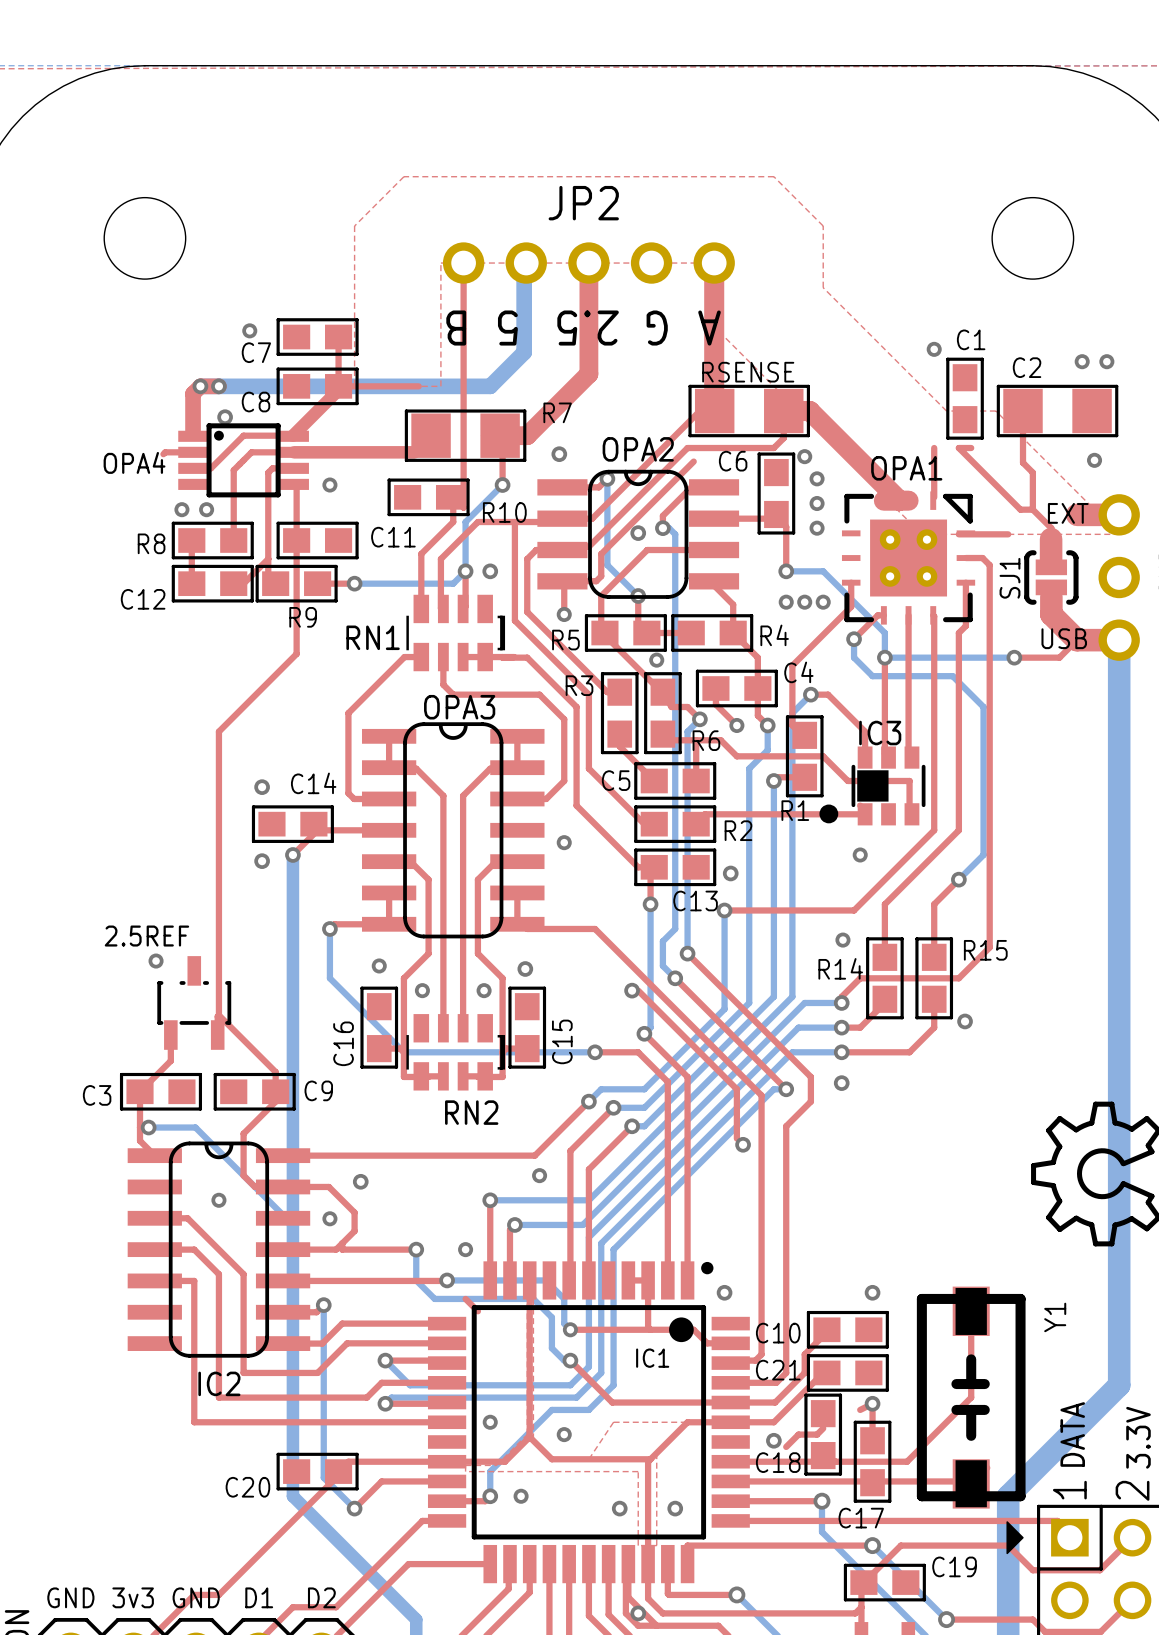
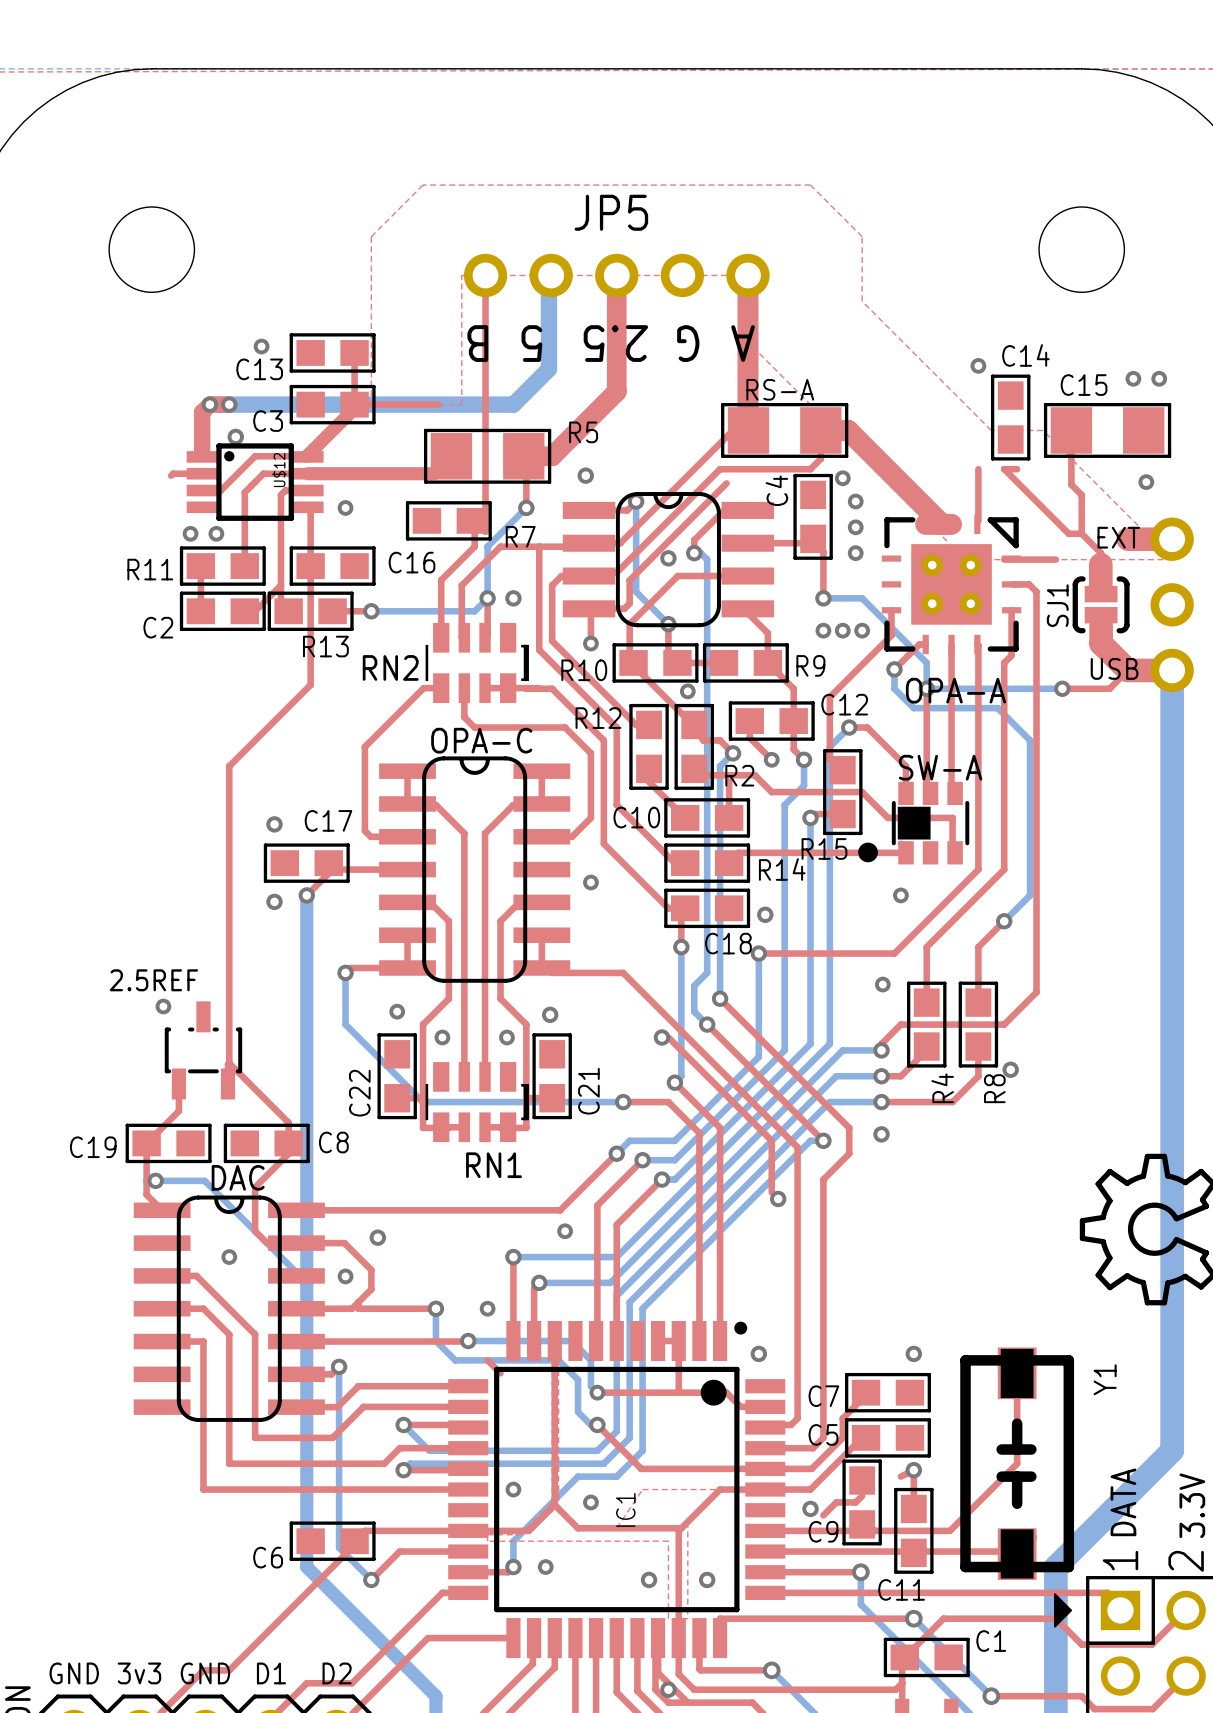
JP2 name: JP2 (583, 203) -> JP5 (611, 212)
C1 name: C1 (971, 339) -> C14 (1025, 355)
C7 name: C7 (256, 352) -> C13 (259, 369)
C2 name: C2 (1027, 367) -> C15 (1084, 385)
RSENSE name: RSENSE (748, 372) -> RS-A (780, 389)
C8 name: C8 (255, 402) -> C3 (268, 421)
R7 name: R7 (557, 412) -> R5 (583, 432)
text: OPA2 (638, 449) -> none
C6 name: C6 (733, 461) -> C4 (776, 490)
OPA4 name: OPA4 (134, 462) -> U$12 (279, 470)
text: OPA1 (906, 468) -> none
R10 name: R10 (504, 512) -> R7 (520, 536)
C11 name: C11 (393, 537) -> C16 (412, 562)
R8 name: R8 (151, 543) -> R11 (150, 569)
C12 name: C12 (143, 599) -> C2 (158, 627)
R9 name: R9 (303, 617) -> R13 (325, 646)
R4 name: R4 (774, 635) -> R9 (810, 665)
RN1 name: RN1 (373, 637) -> RN2 (390, 667)
R5 name: R5 (565, 640) -> R10 (584, 670)
text: none -> OPA-A (955, 690)
C4 name: C4 (798, 672) -> C12 (844, 704)
R3 name: R3 (579, 685) -> R12 (598, 718)
OPA3 name: OPA3 (459, 707) -> OPA-C (481, 740)
IC3 name: IC3 (880, 733) -> SW-A (940, 767)
R6 name: R6 (706, 740) -> R2 (739, 775)
C5 name: C5 (616, 780) -> C10 (636, 817)
C14 name: C14 (313, 783) -> C17 (328, 820)
R1 name: R1 (795, 810) -> R15 (824, 848)
R2 name: R2 (738, 830) -> R14 (782, 869)
C13 name: C13 (695, 900) -> C18 (728, 943)
R15 name: R15 (985, 950) -> R8 (994, 1088)
R14 name: R14 (840, 968) -> R4 (942, 1088)
C15 name: C15 (562, 1041) -> C21 (588, 1091)
C16 name: C16 (343, 1043) -> C22 (359, 1093)
C9 name: C9 (318, 1090) -> C8 (333, 1142)
C3 name: C3 (97, 1095) -> C19 (93, 1147)
RN2 name: RN2 (471, 1112) -> RN1 (494, 1165)
C10 name: C10 (778, 1333) -> C7 (823, 1396)
part value rotation: 0° (652, 1358) -> 90° counterclockwise (625, 1509)
part value position: IC1 (652, 1358) -> IC1 (625, 1509)
C21 name: C21 (778, 1370) -> C5 (823, 1434)
IC2 name: IC2 (219, 1383) -> DAC (238, 1177)
C18 name: C18 (778, 1462) -> C9 (823, 1531)
C20 name: C20 (247, 1487) -> C6 (268, 1557)
C17 name: C17 (861, 1518) -> C11 (901, 1589)
C19 name: C19 (954, 1566) -> C1 (991, 1641)

